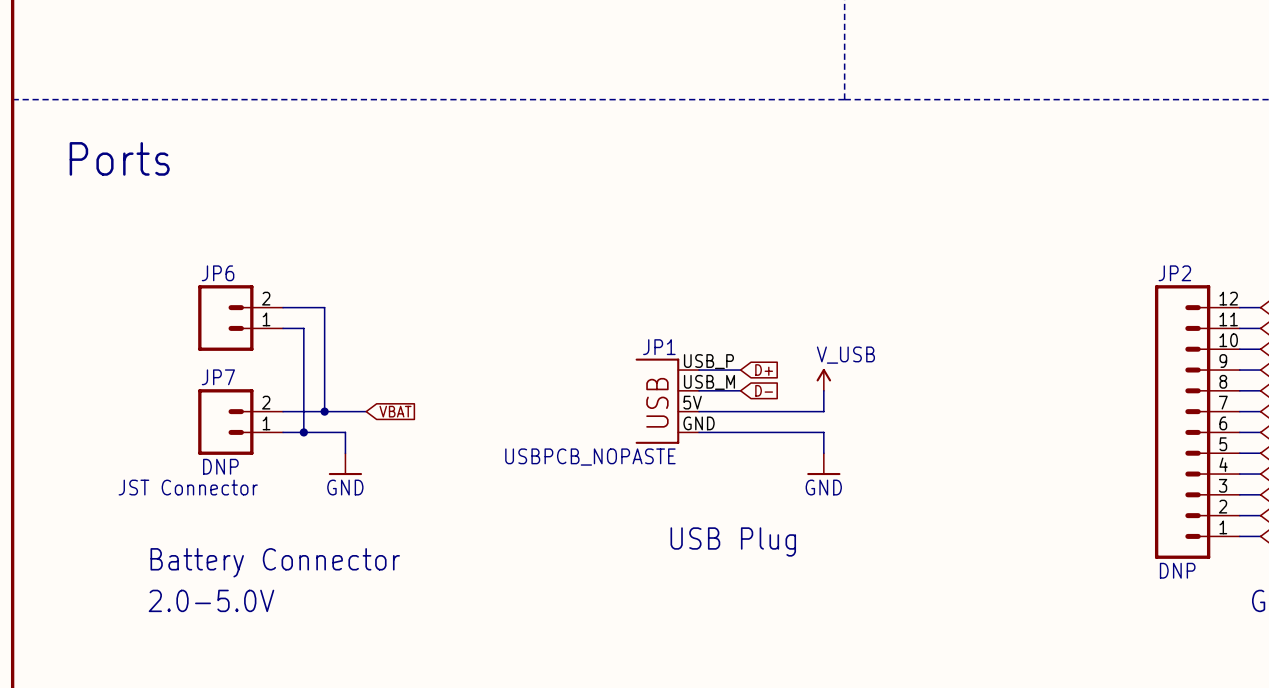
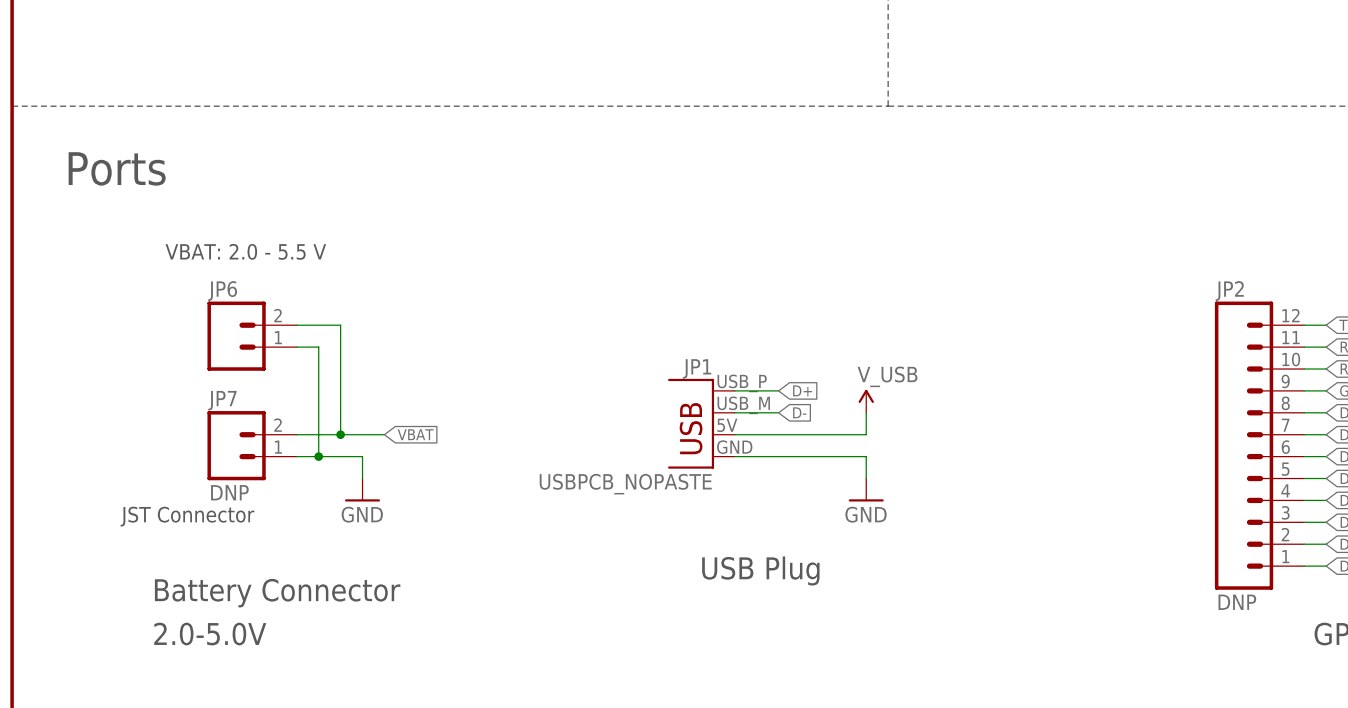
text: none -> VBAT: 2.0 - 5.5 V (245, 251)

